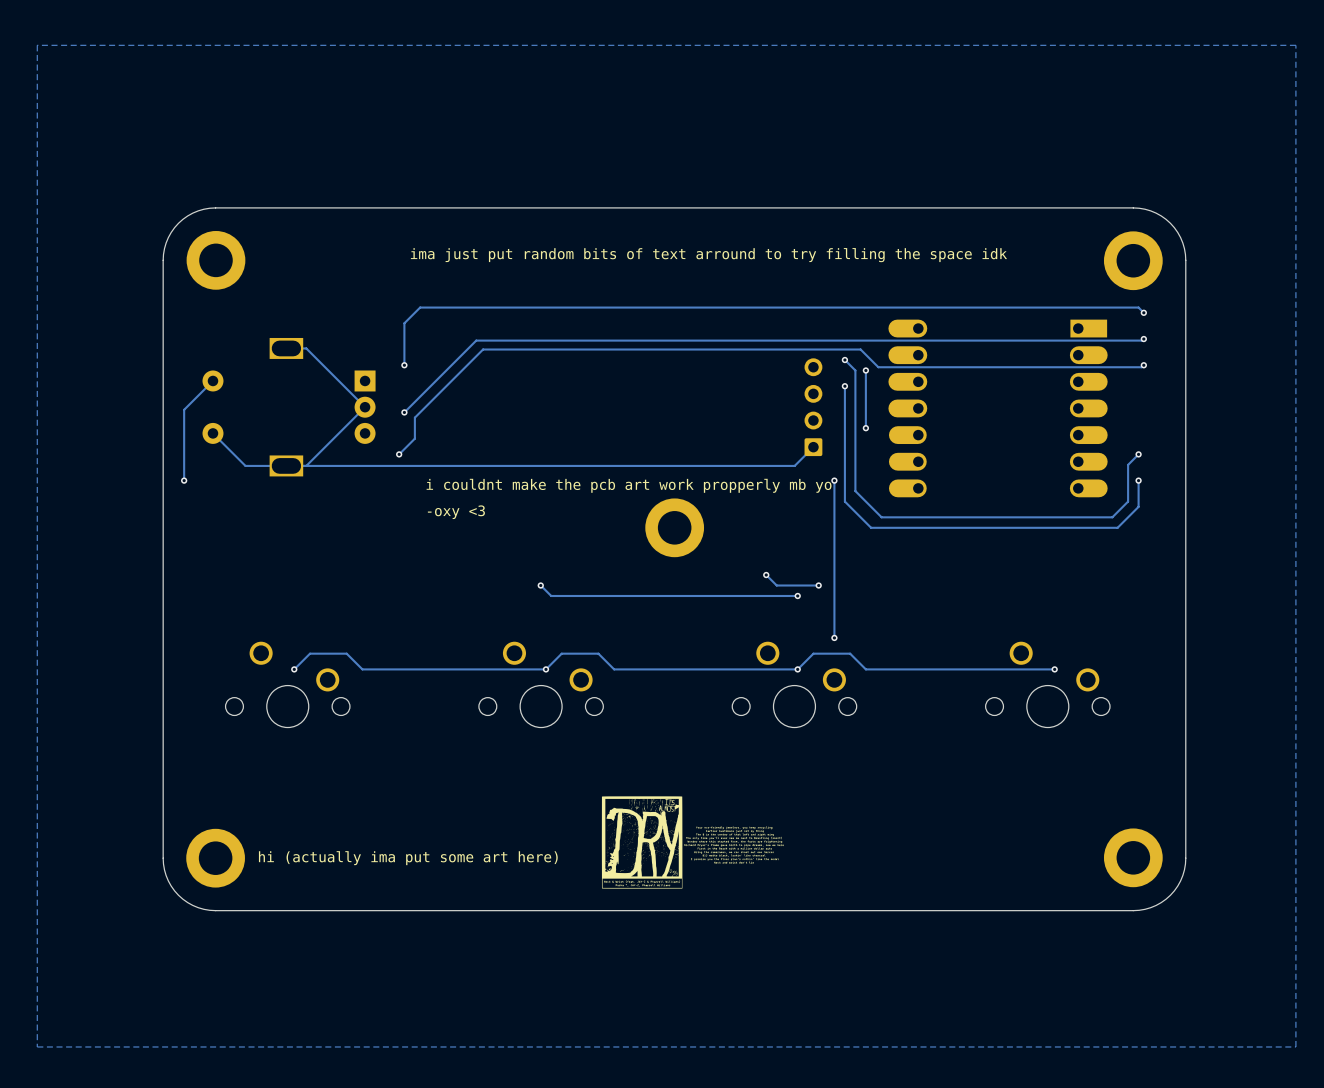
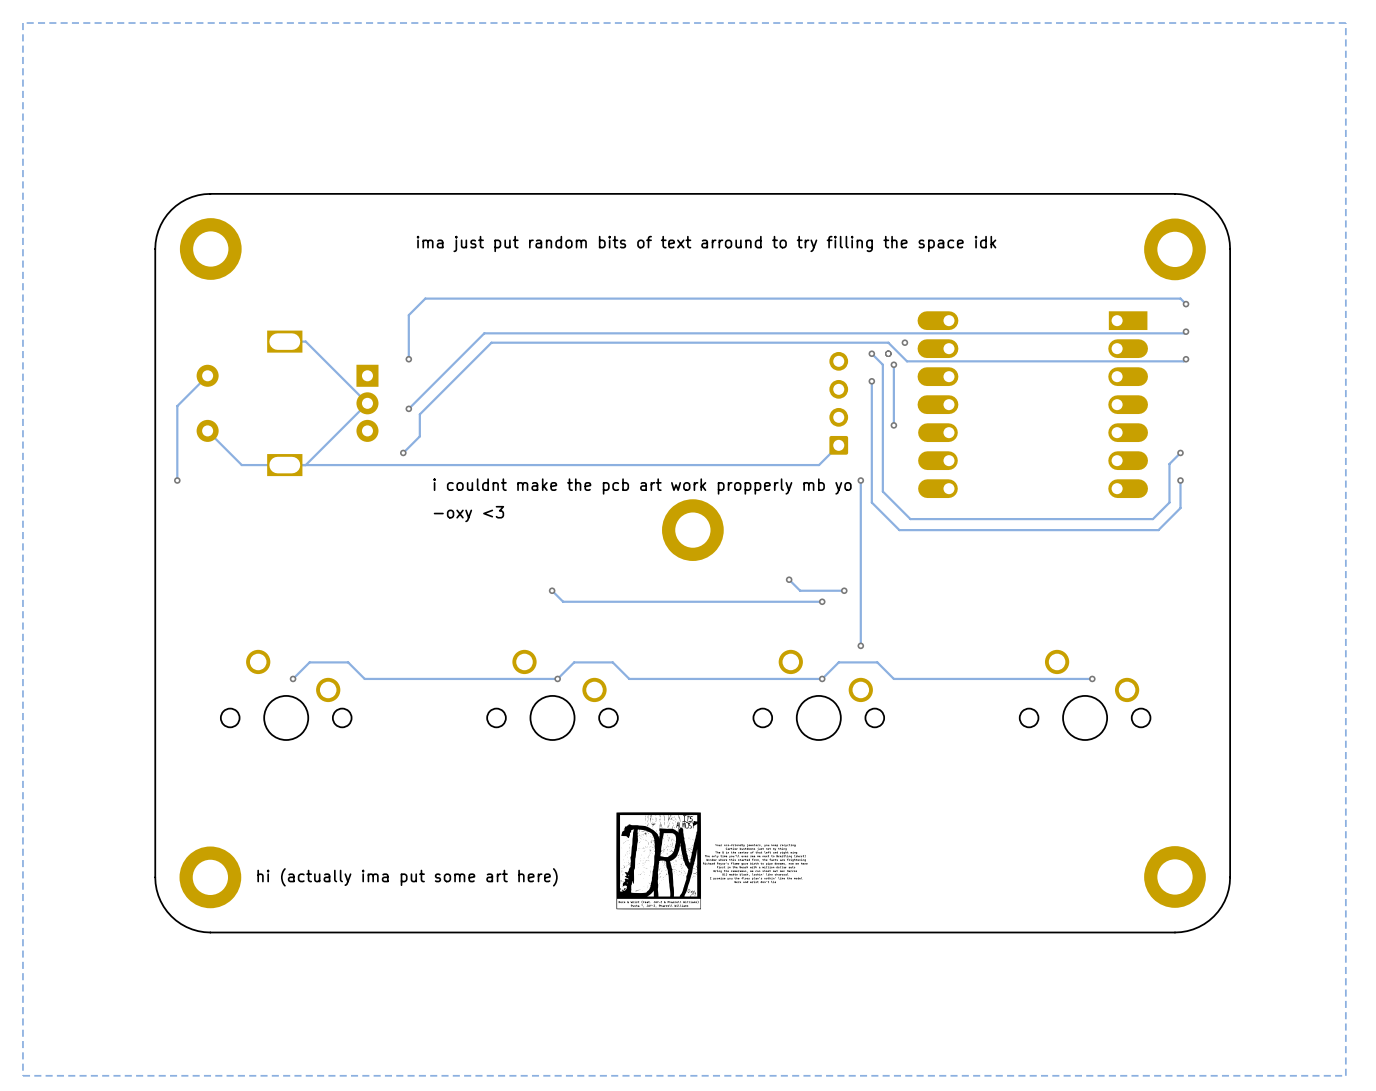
via: none -> (904, 342)
via: none -> (888, 353)

